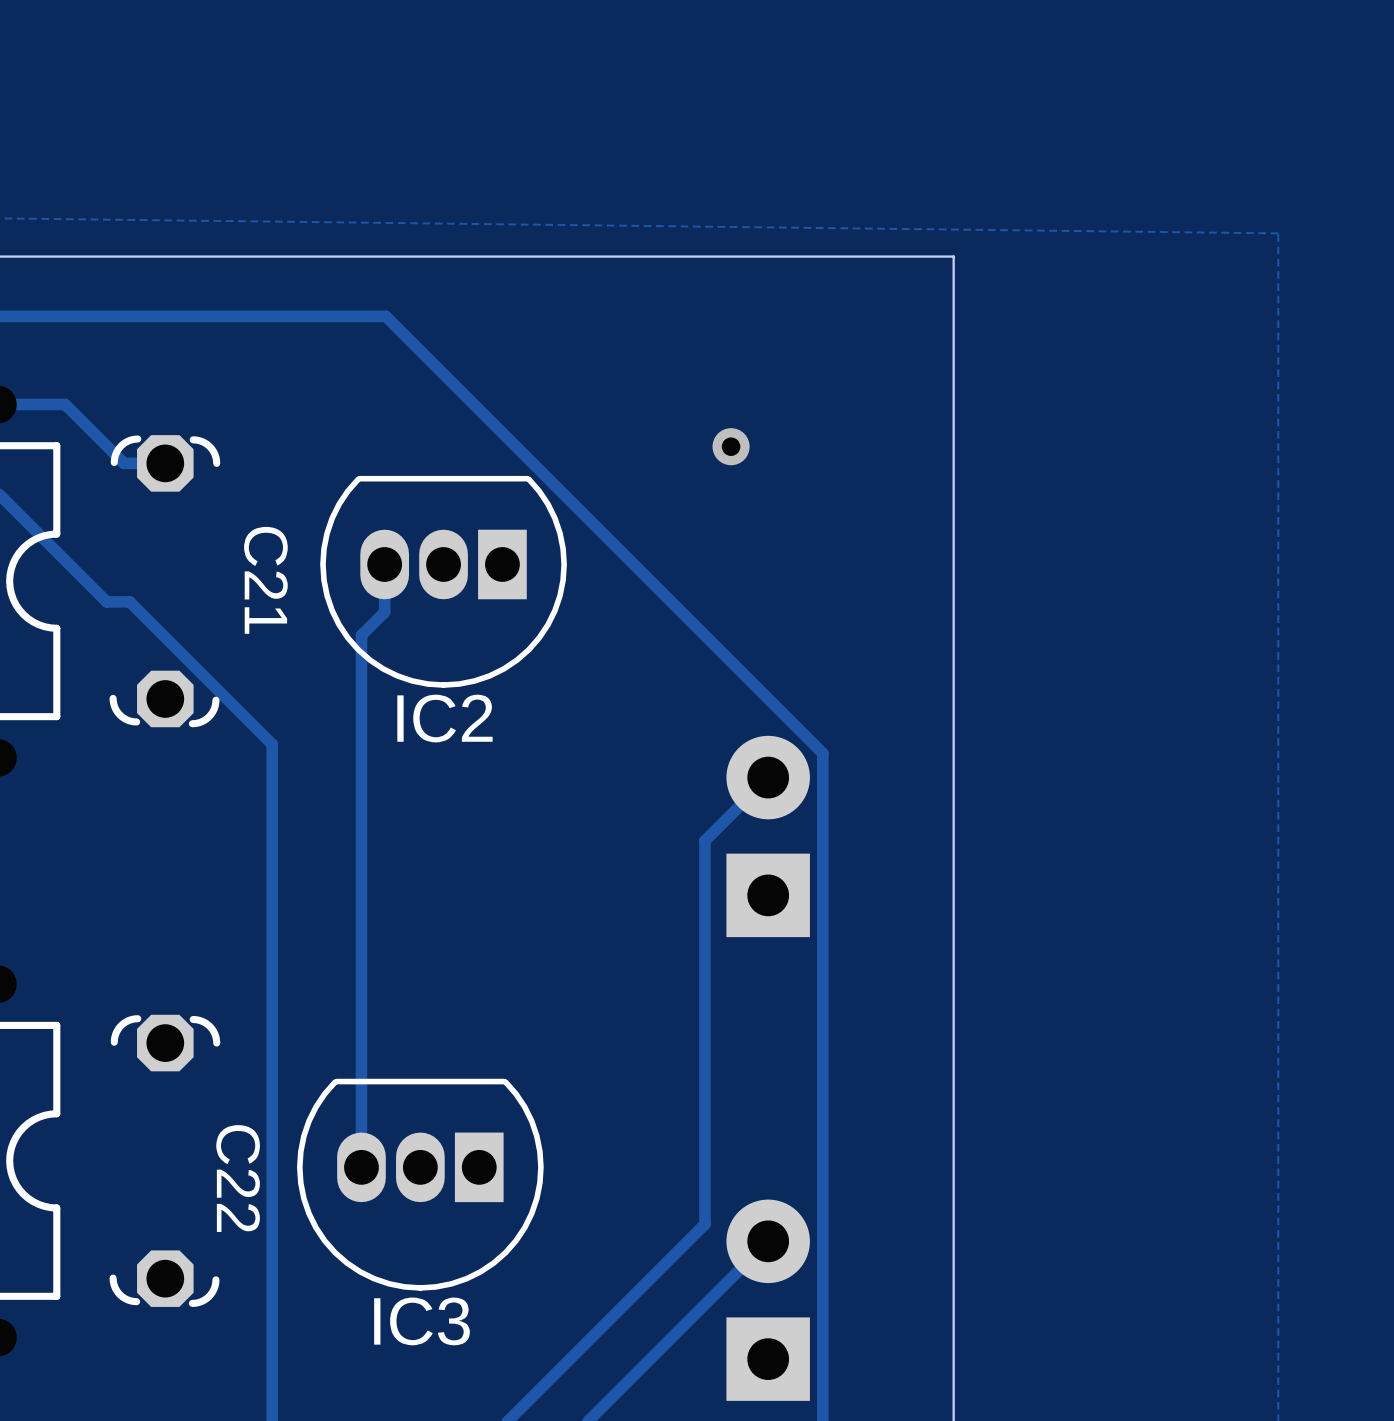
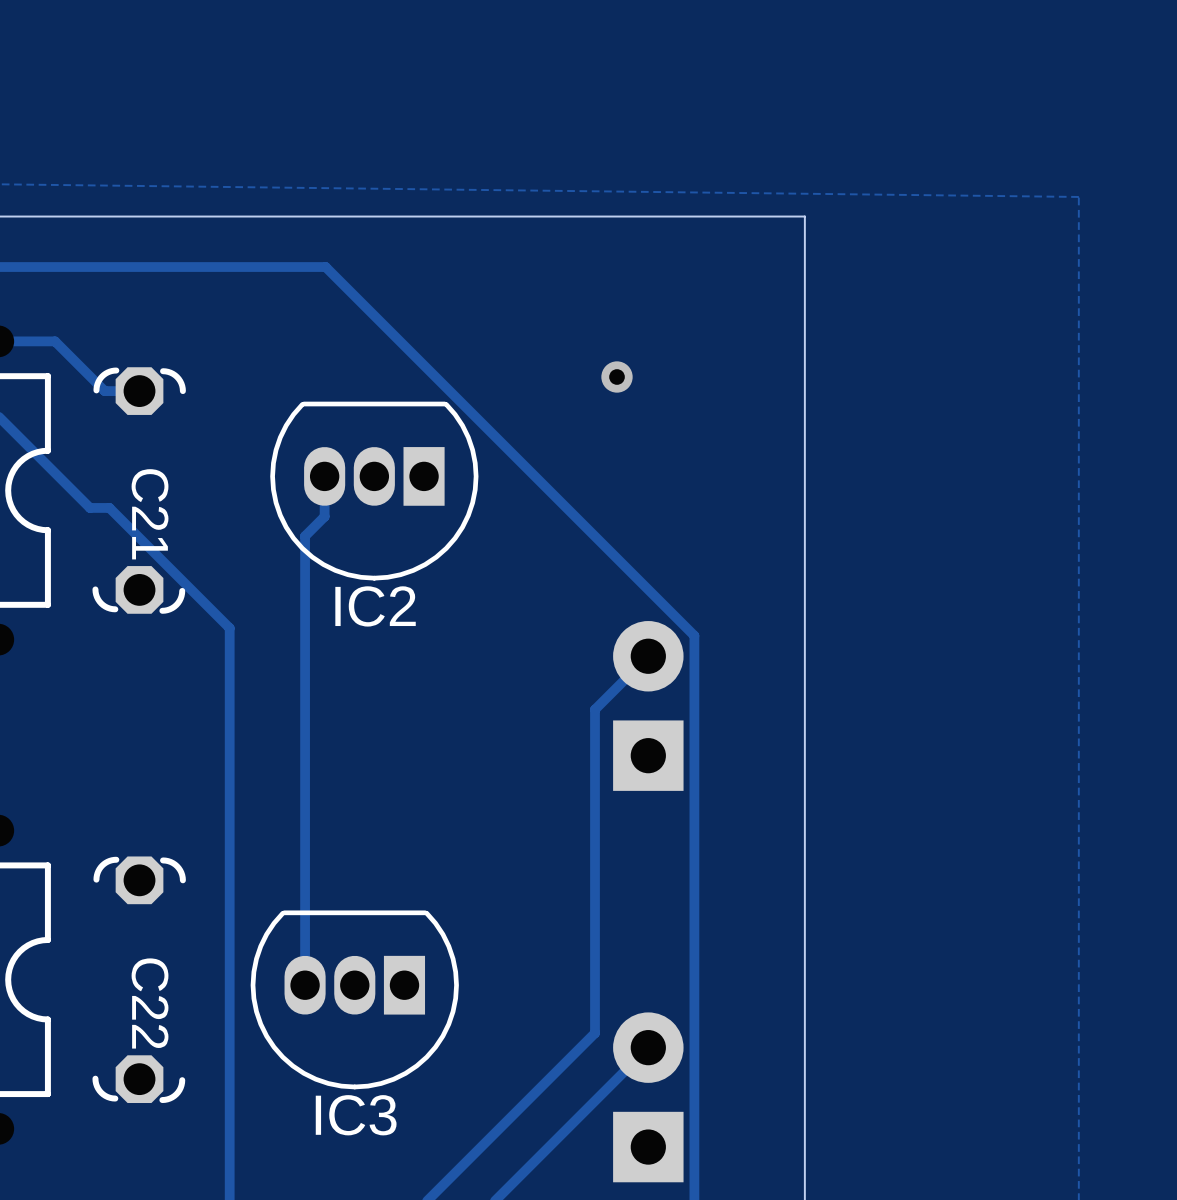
C21 name position: C21 (265, 580) -> C21 (150, 514)
C22 name position: C22 (238, 1178) -> C22 (150, 1003)

